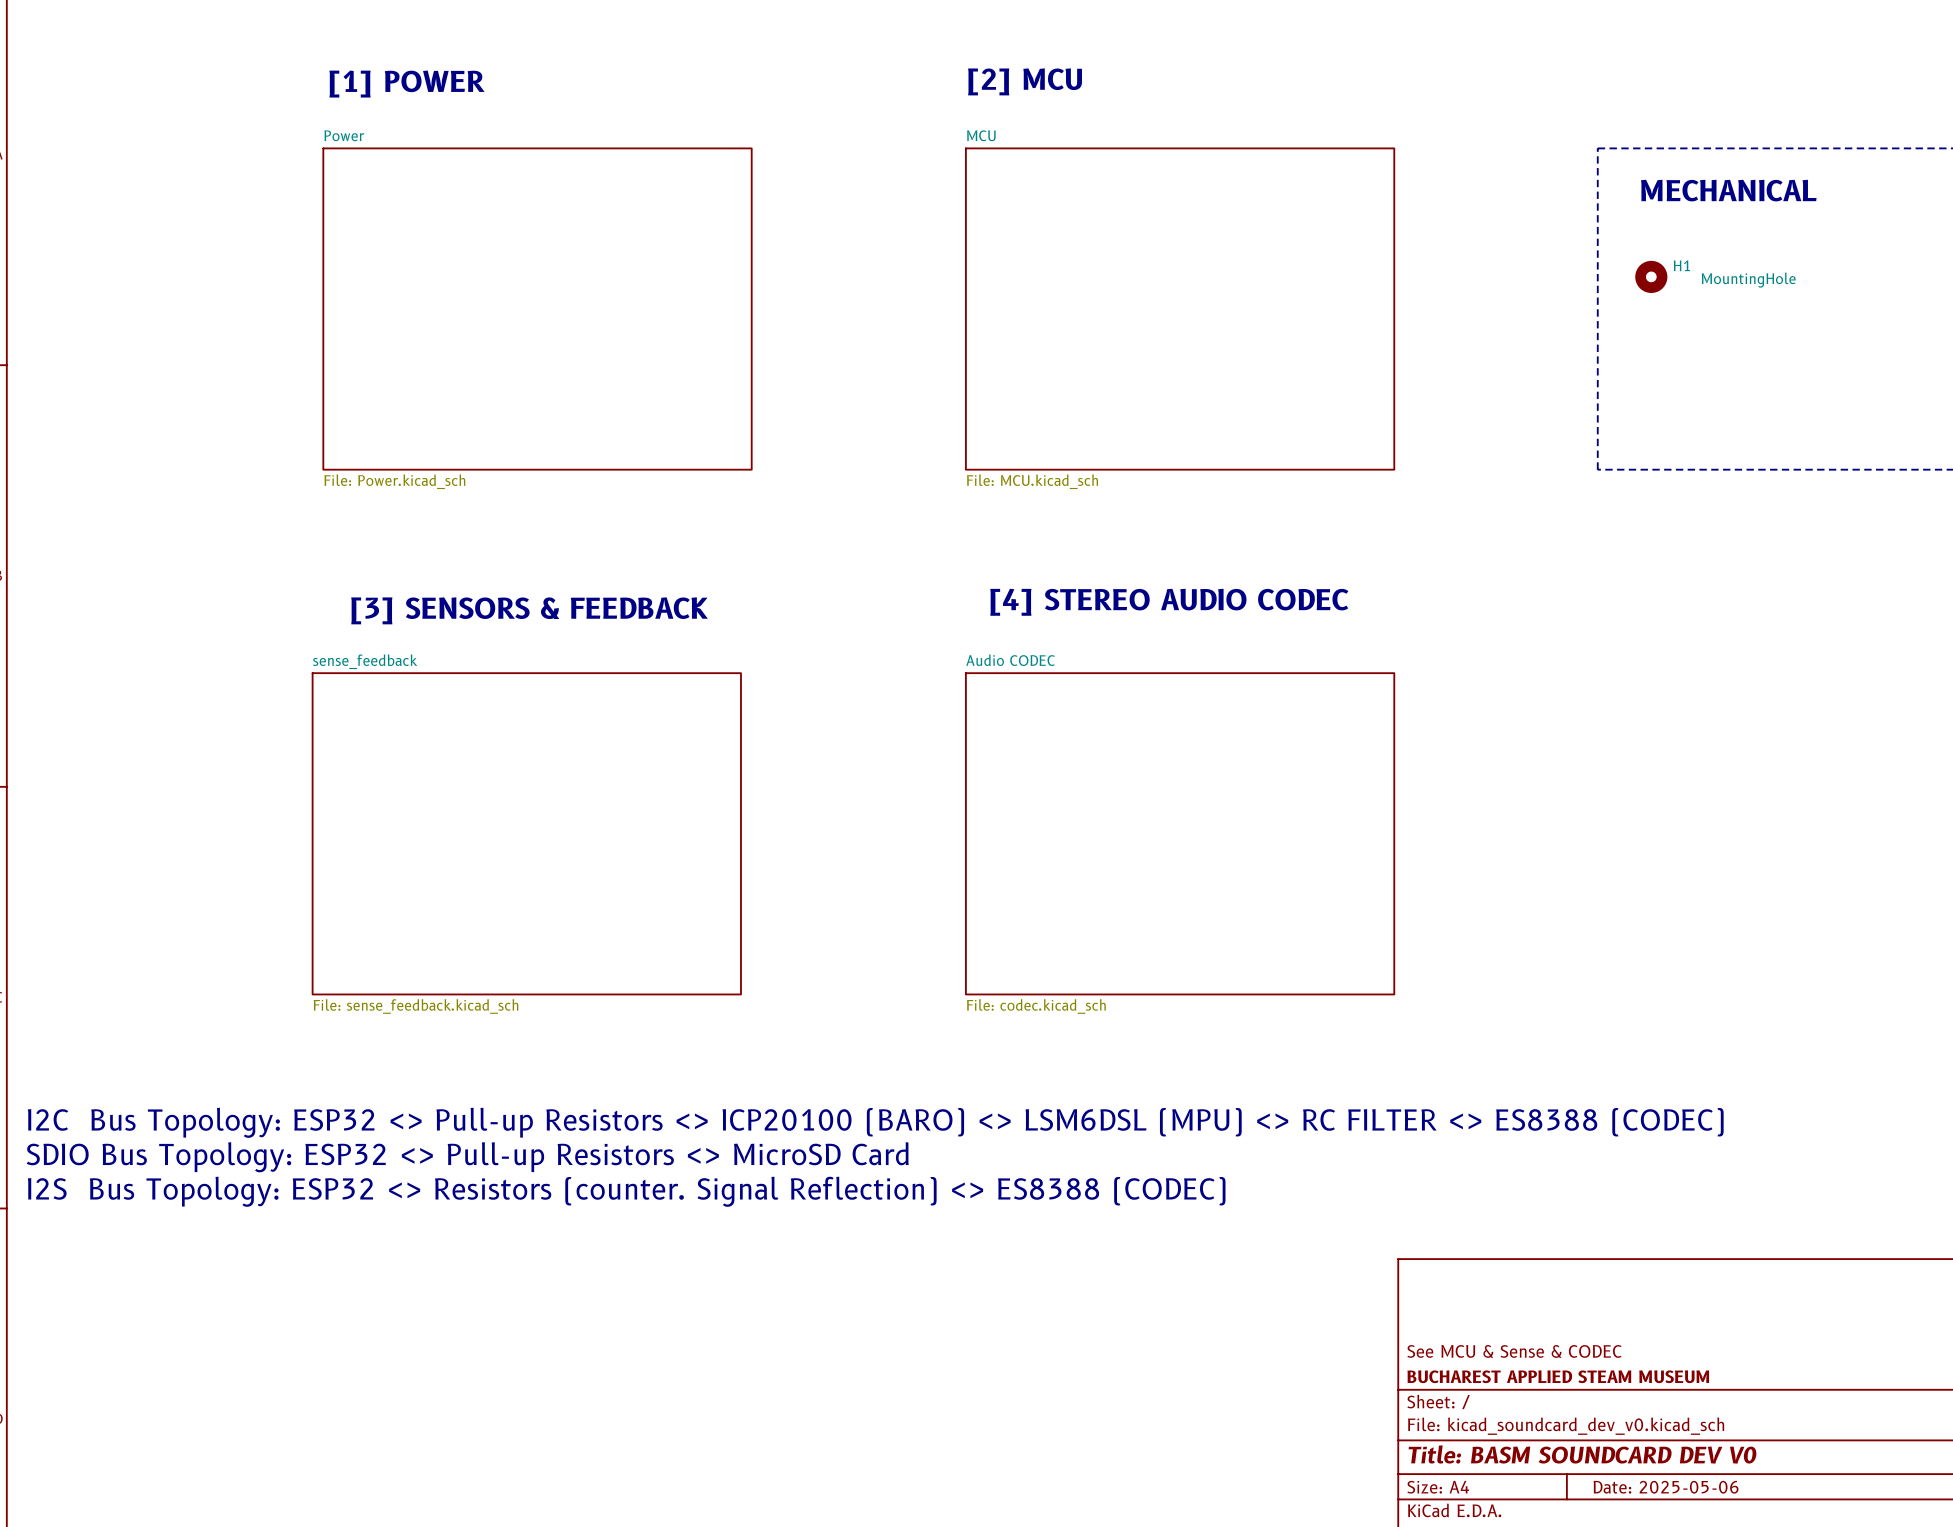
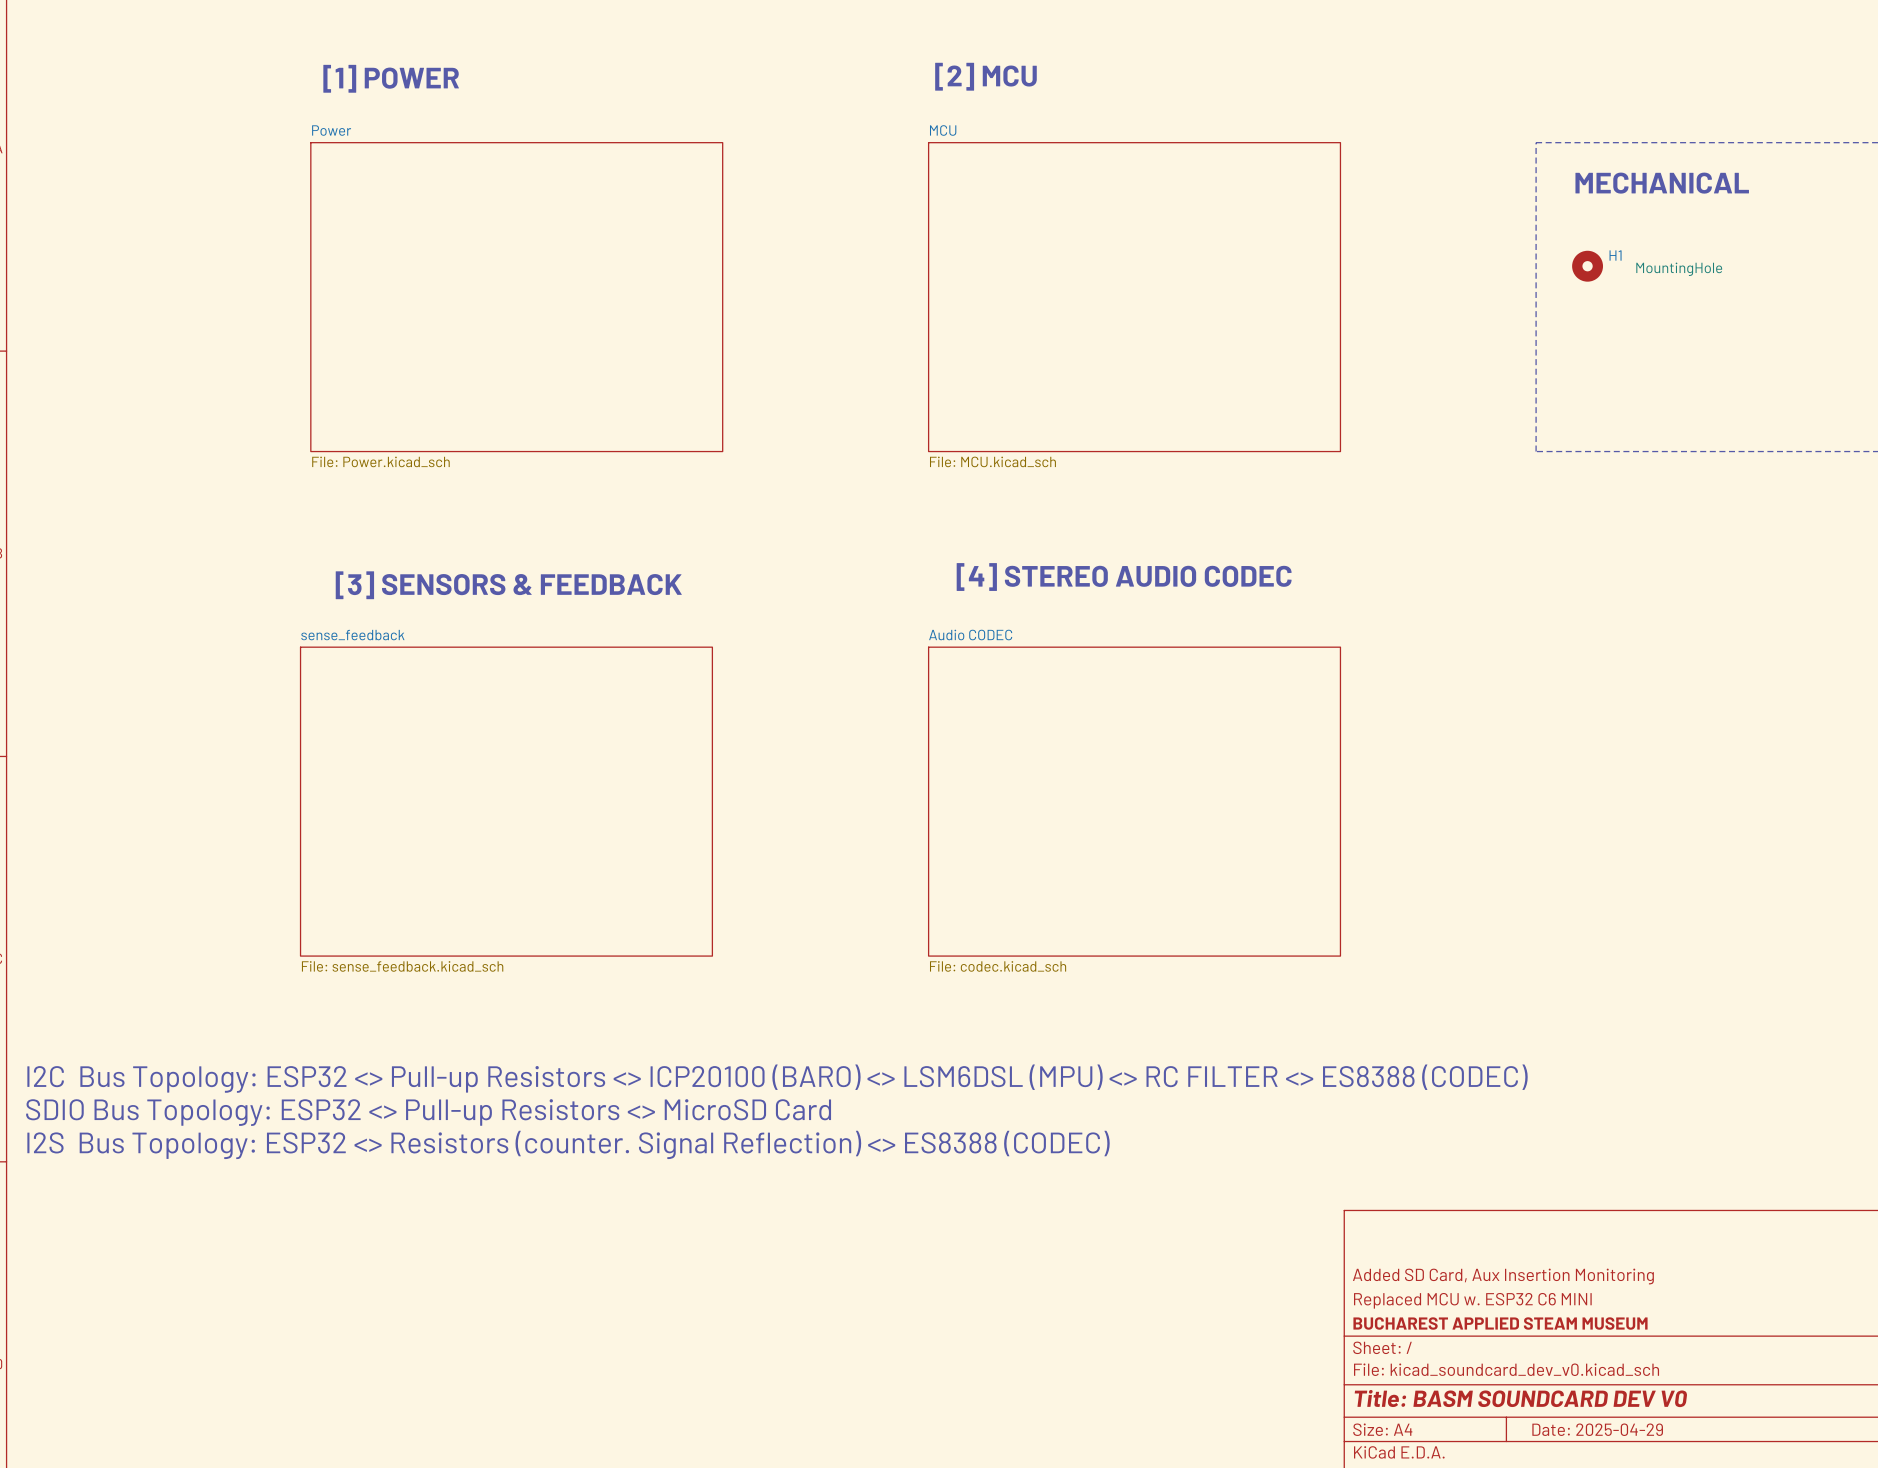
title block: none -> Added SD Card, Aux Insertion Monitoring (1503, 1276)
title block: See MCU & Sense & CODEC (1514, 1351) -> Replaced MCU w. ESP32 C6 MINI (1472, 1300)
title block: Date: 2025-05-06 (1666, 1487) -> Date: 2025-04-29 (1597, 1429)

